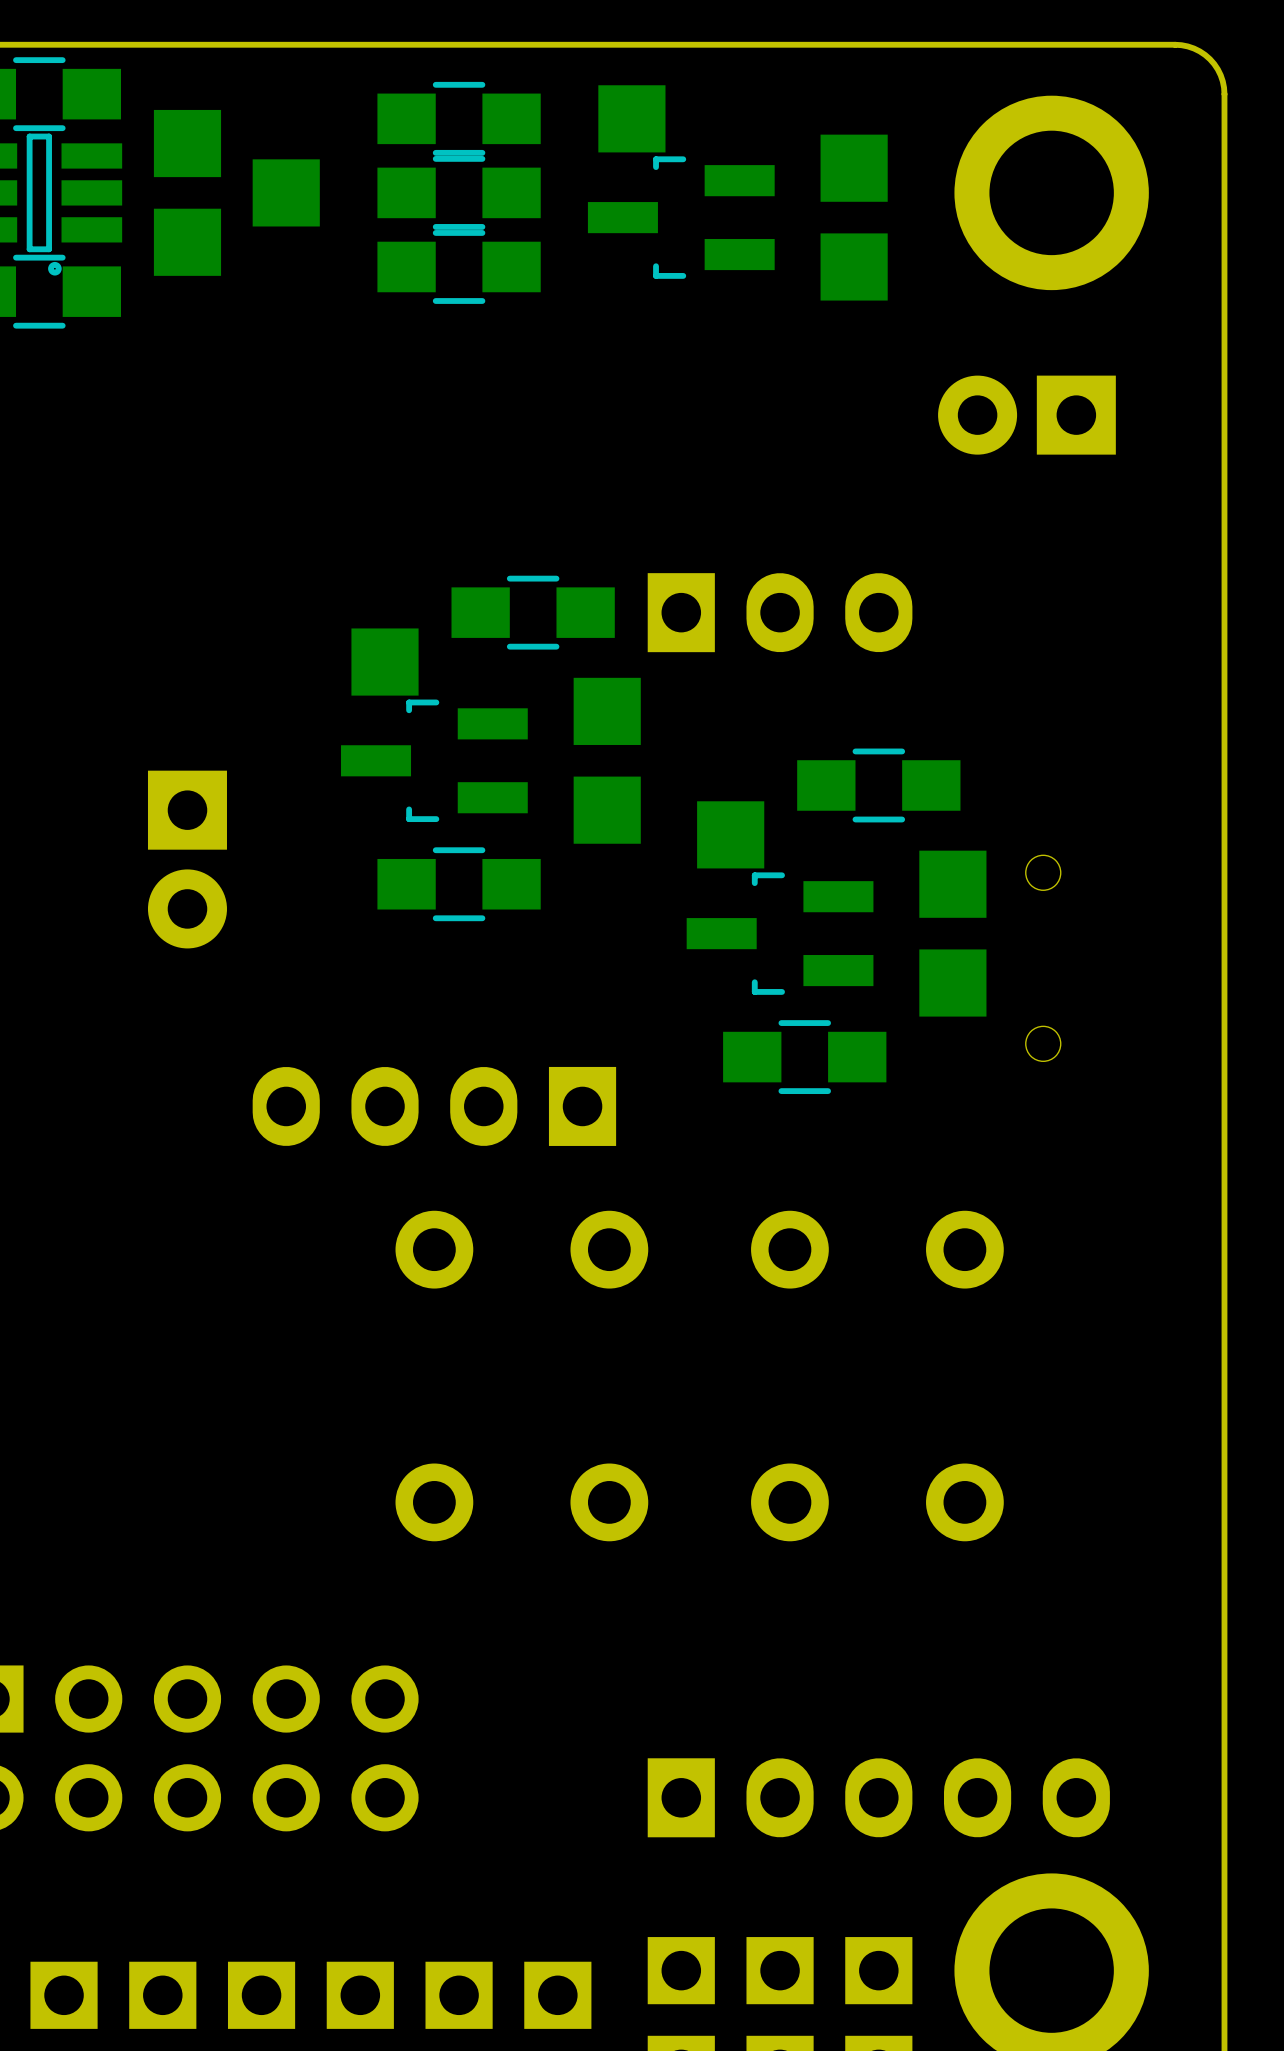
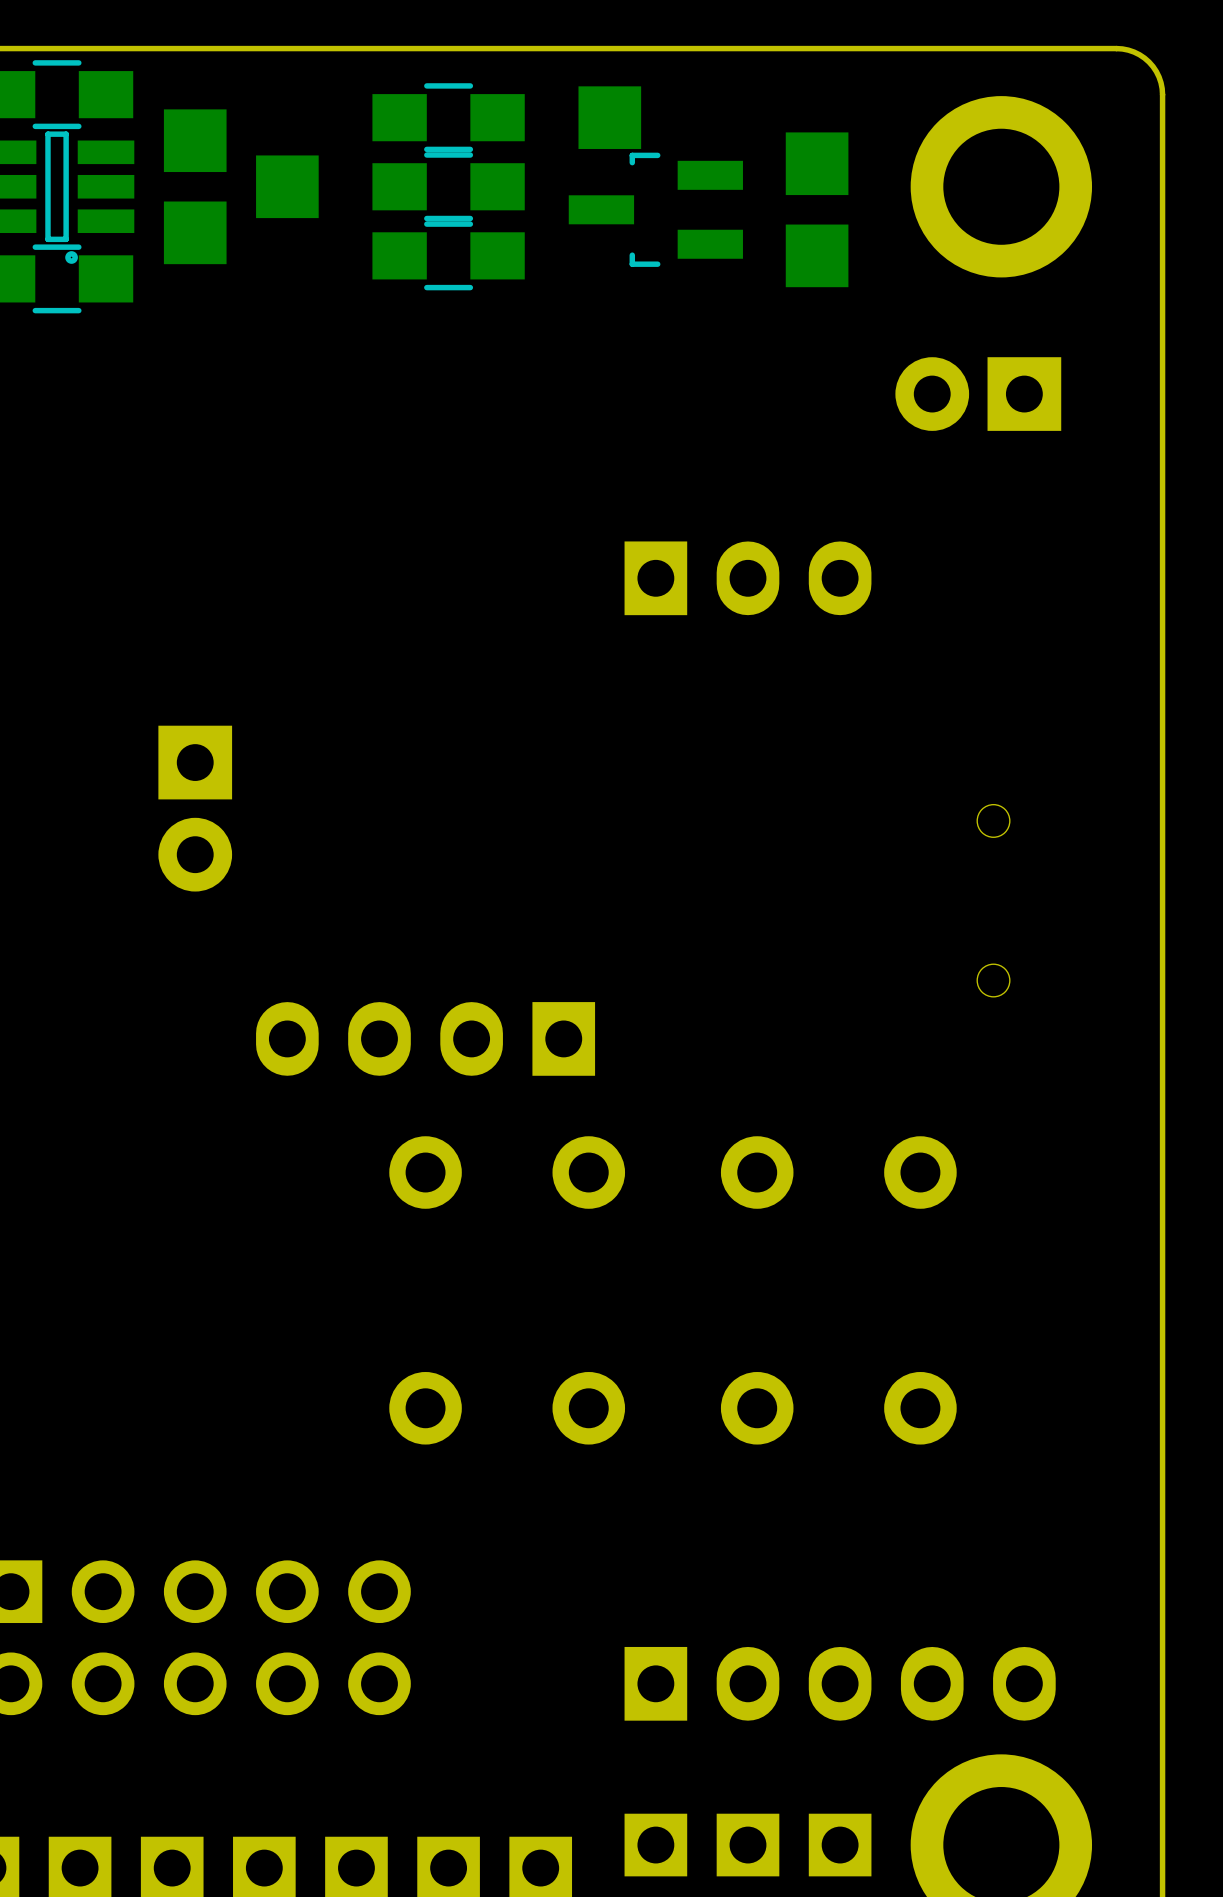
part: (533, 612) -> none
part: (385, 662) -> none
part: (607, 711) -> none
part: (434, 760) -> none
part: (878, 785) -> none
part: (607, 810) -> none
part: (730, 834) -> none
part: (459, 884) -> none
part: (952, 884) -> none
part: (780, 933) -> none
part: (952, 983) -> none
part: (804, 1057) -> none

